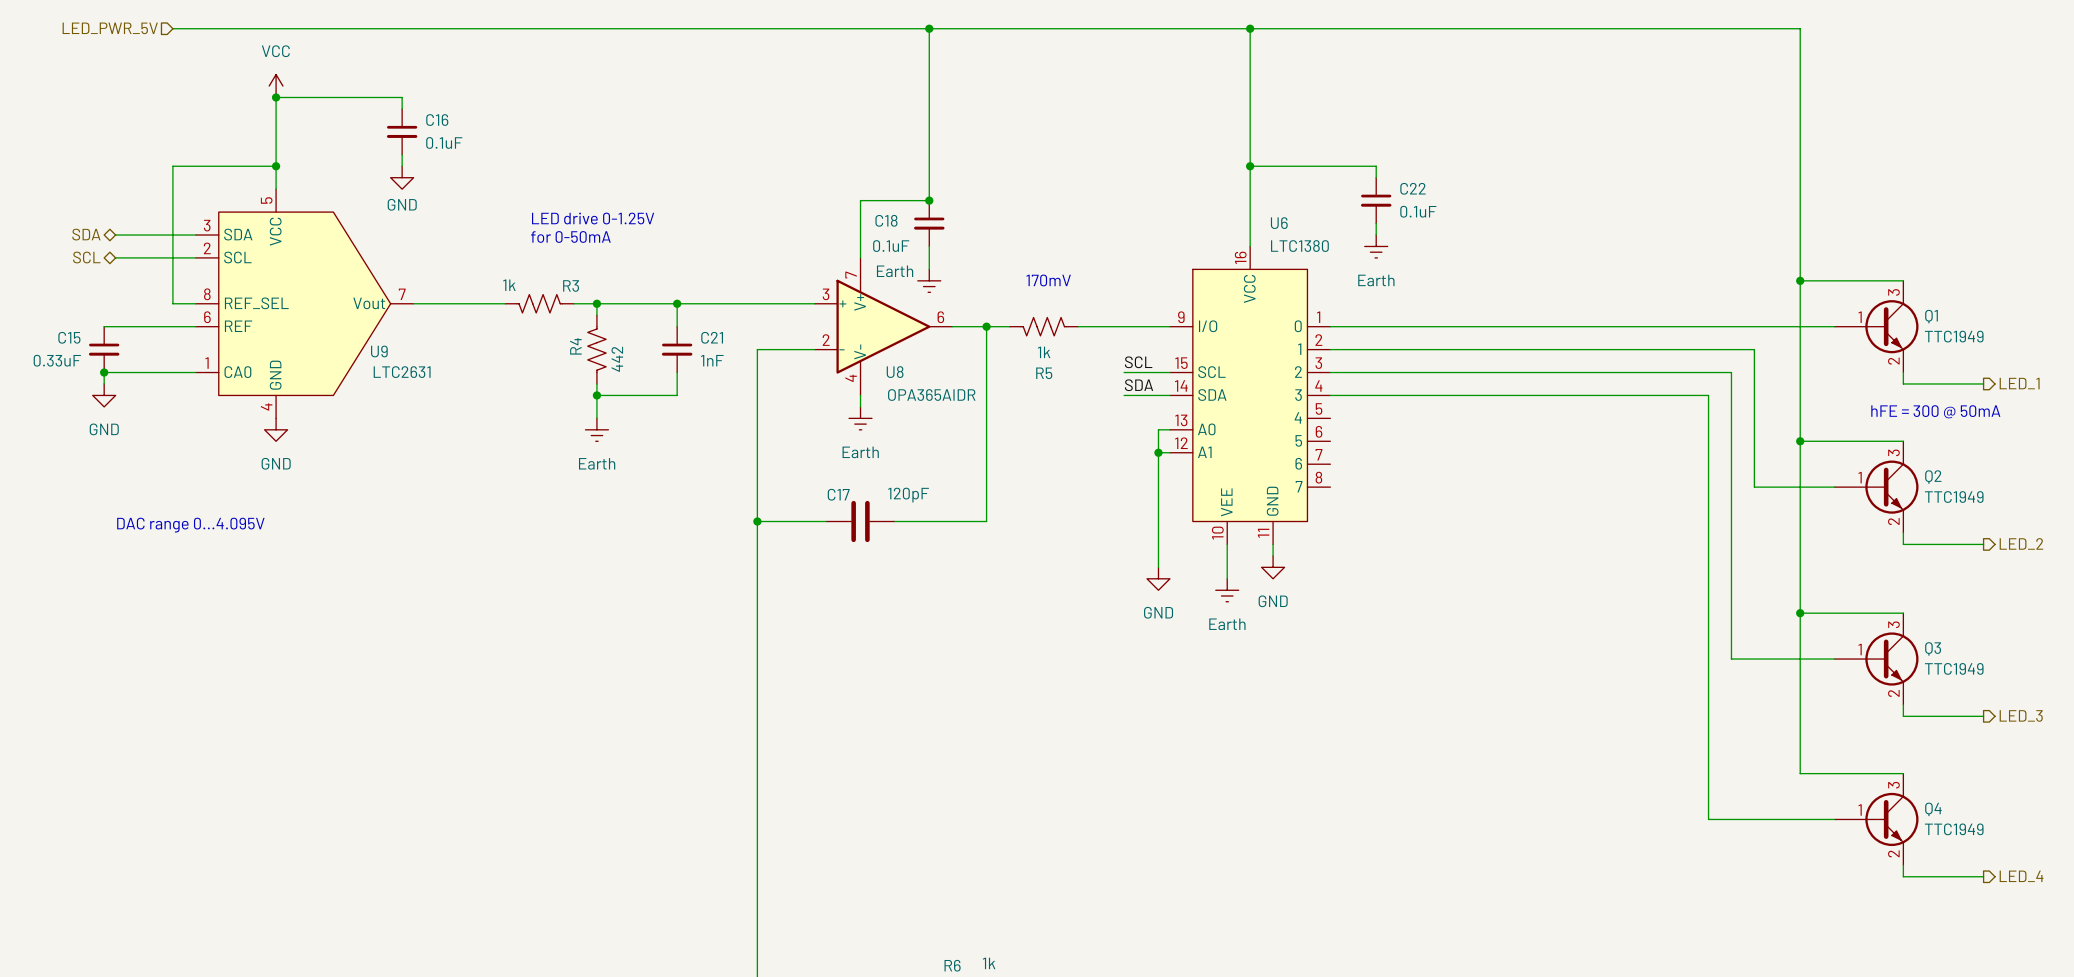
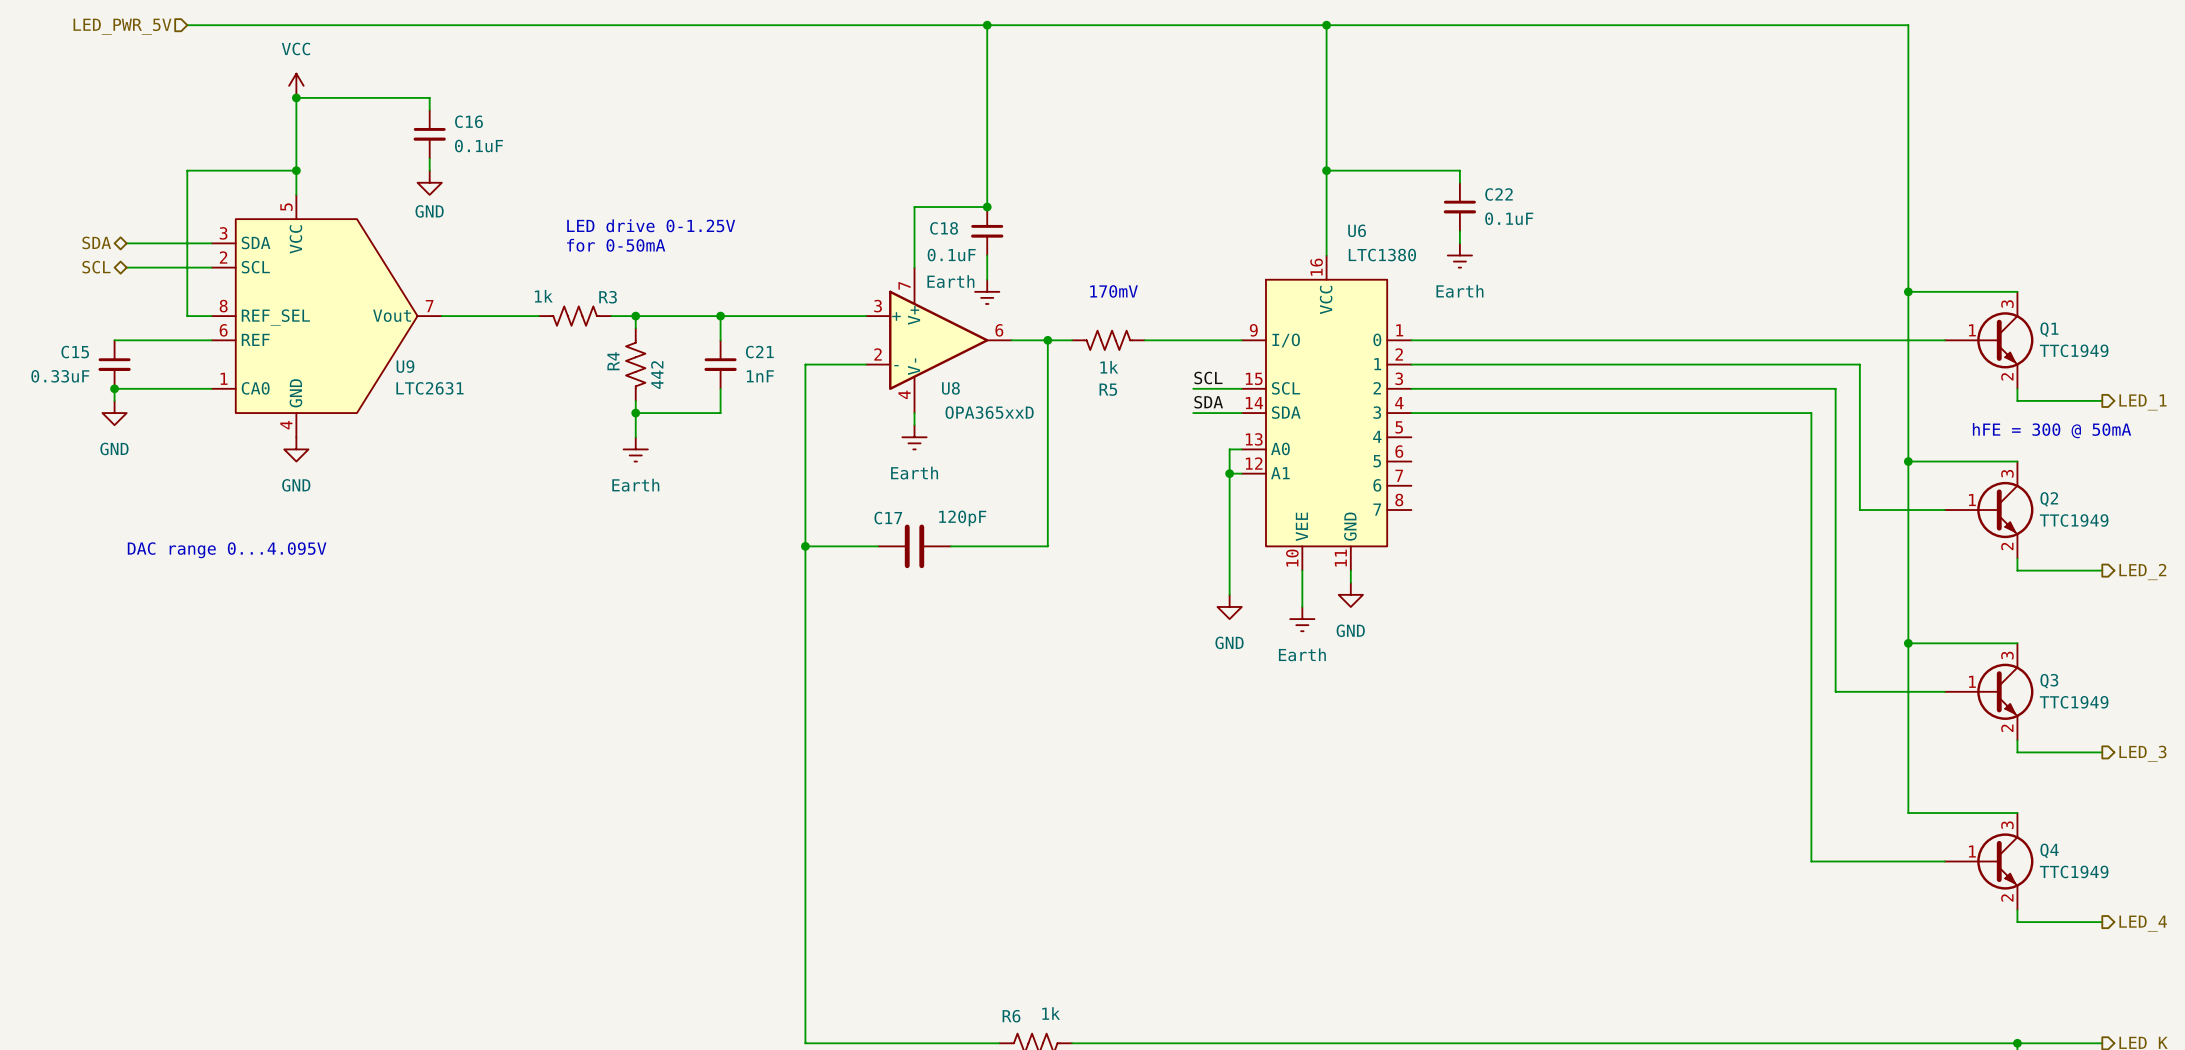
U8 value: OPA365AIDR (931, 395) -> OPA365xxD (989, 412)

